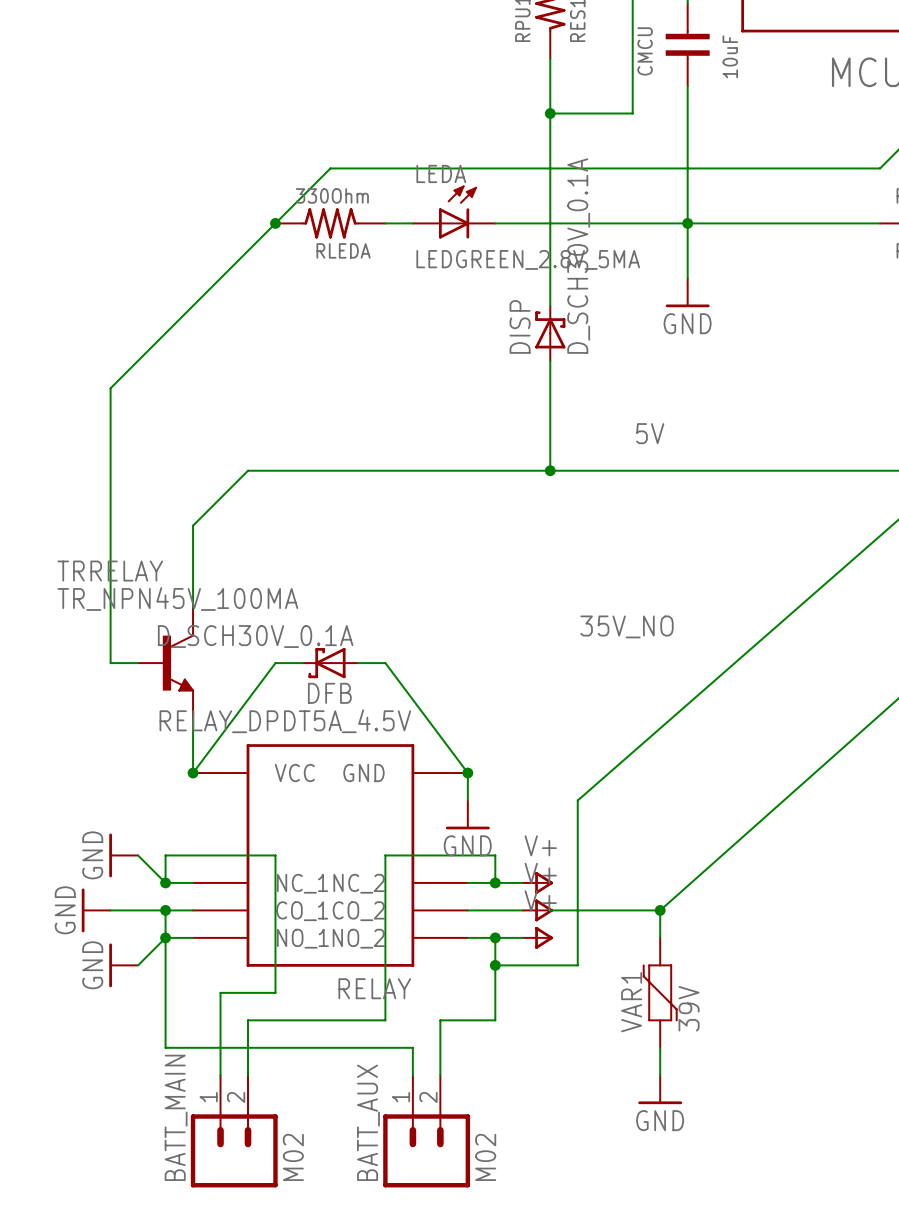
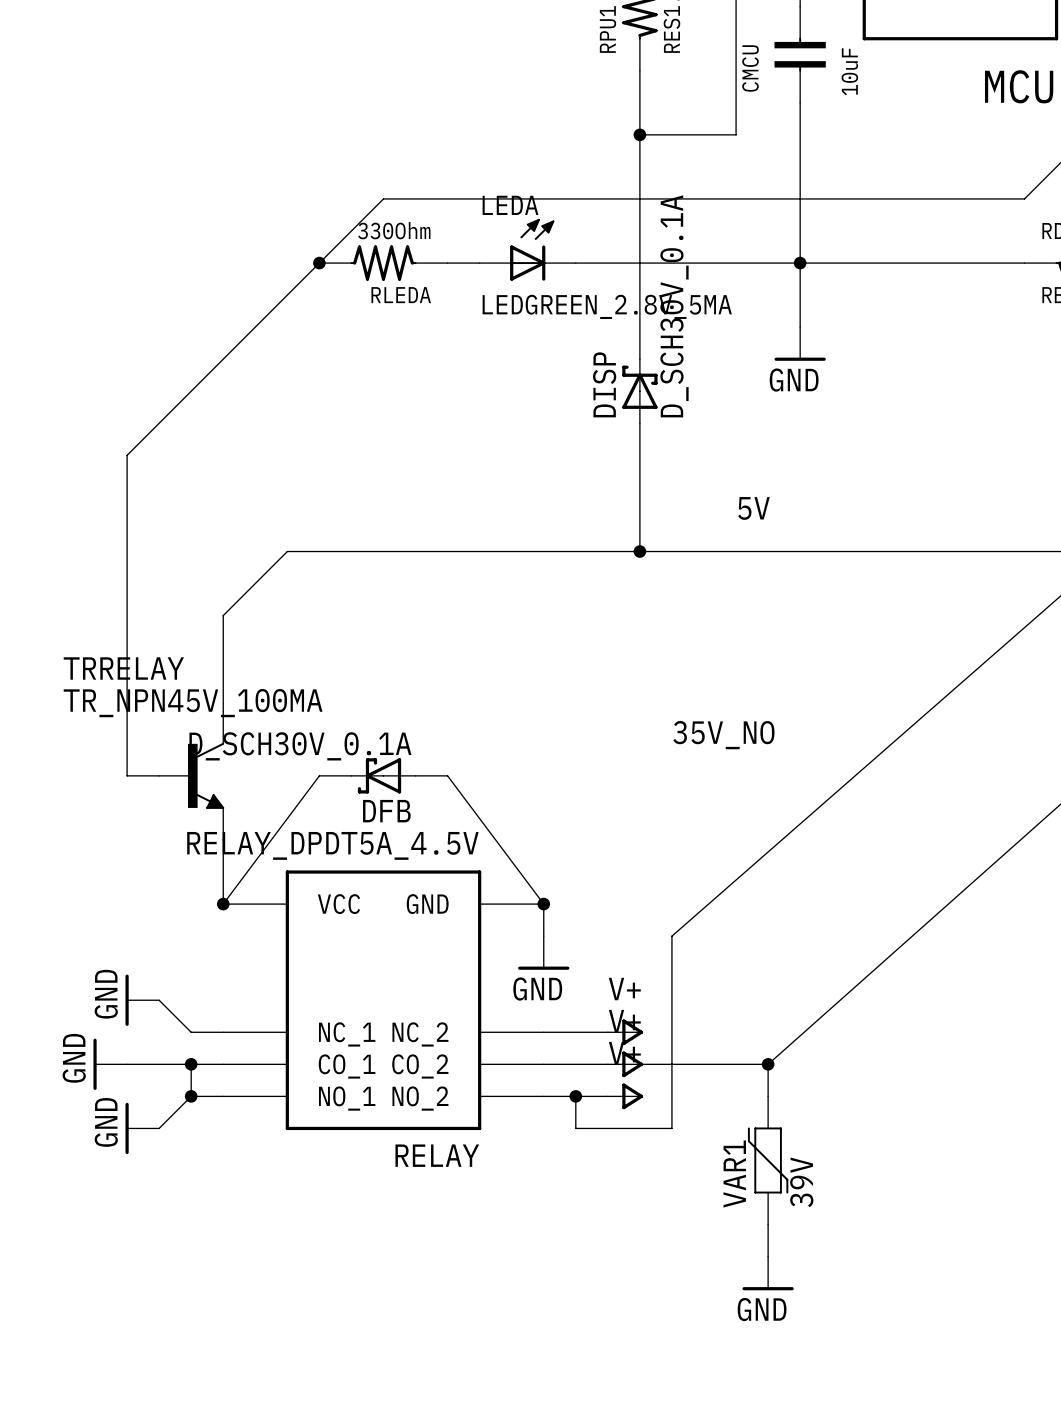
wire: (165, 882) (165, 855) (275, 855) (275, 992) (220, 992) (220, 1075) -> none
junction: (165, 882) -> none
wire: (495, 882) (495, 855) (385, 855) (385, 1020) (248, 1020) (248, 1075) -> none
junction: (495, 882) -> none
wire: (165, 937) (165, 1047) (412, 1047) (412, 1075) -> none
wire: (495, 965) (495, 1020) (440, 1020) (440, 1075) -> none
junction: (495, 965) -> none
BATT_MAIN: M02 (234, 1131) -> none
BATT_AUX: M02 (426, 1131) -> none

